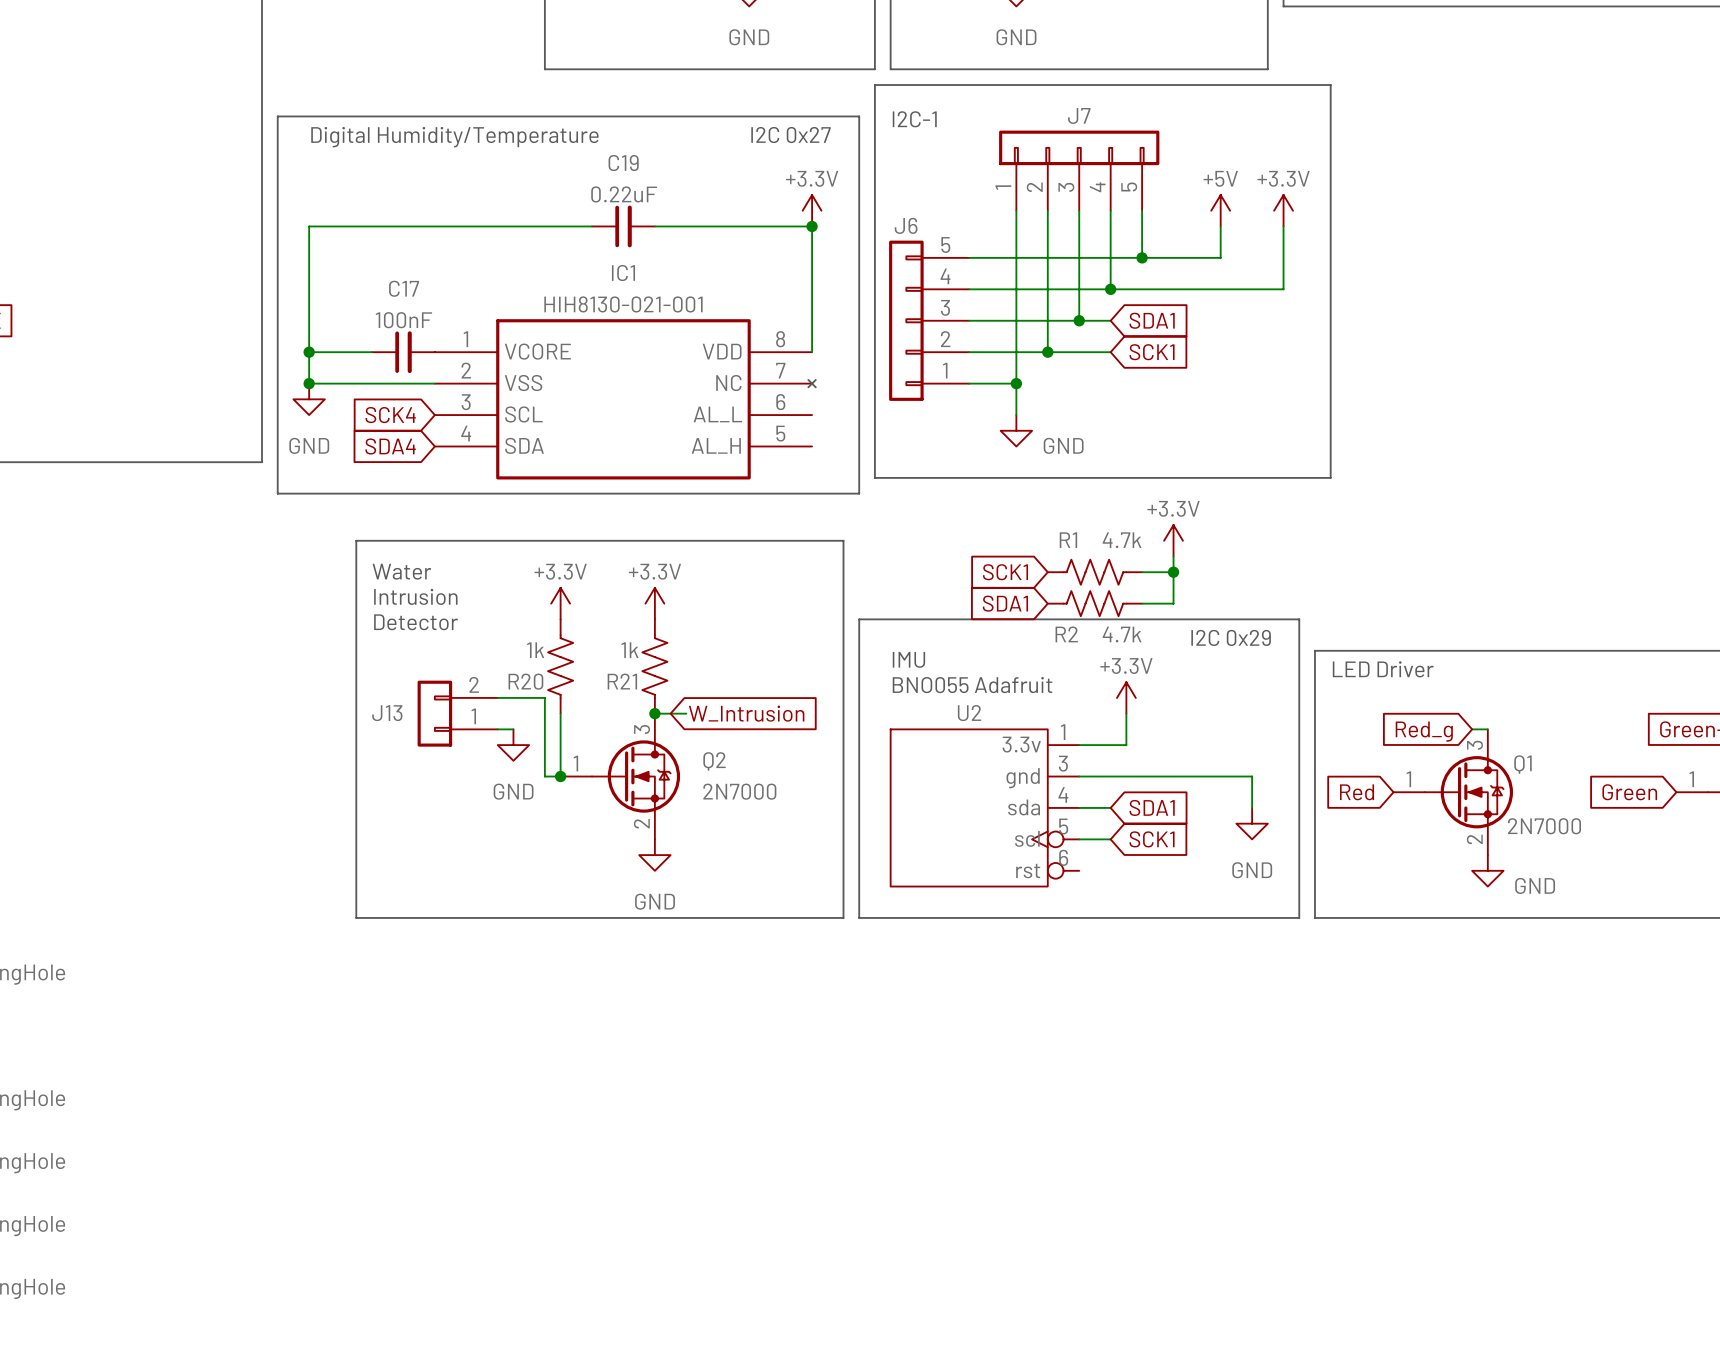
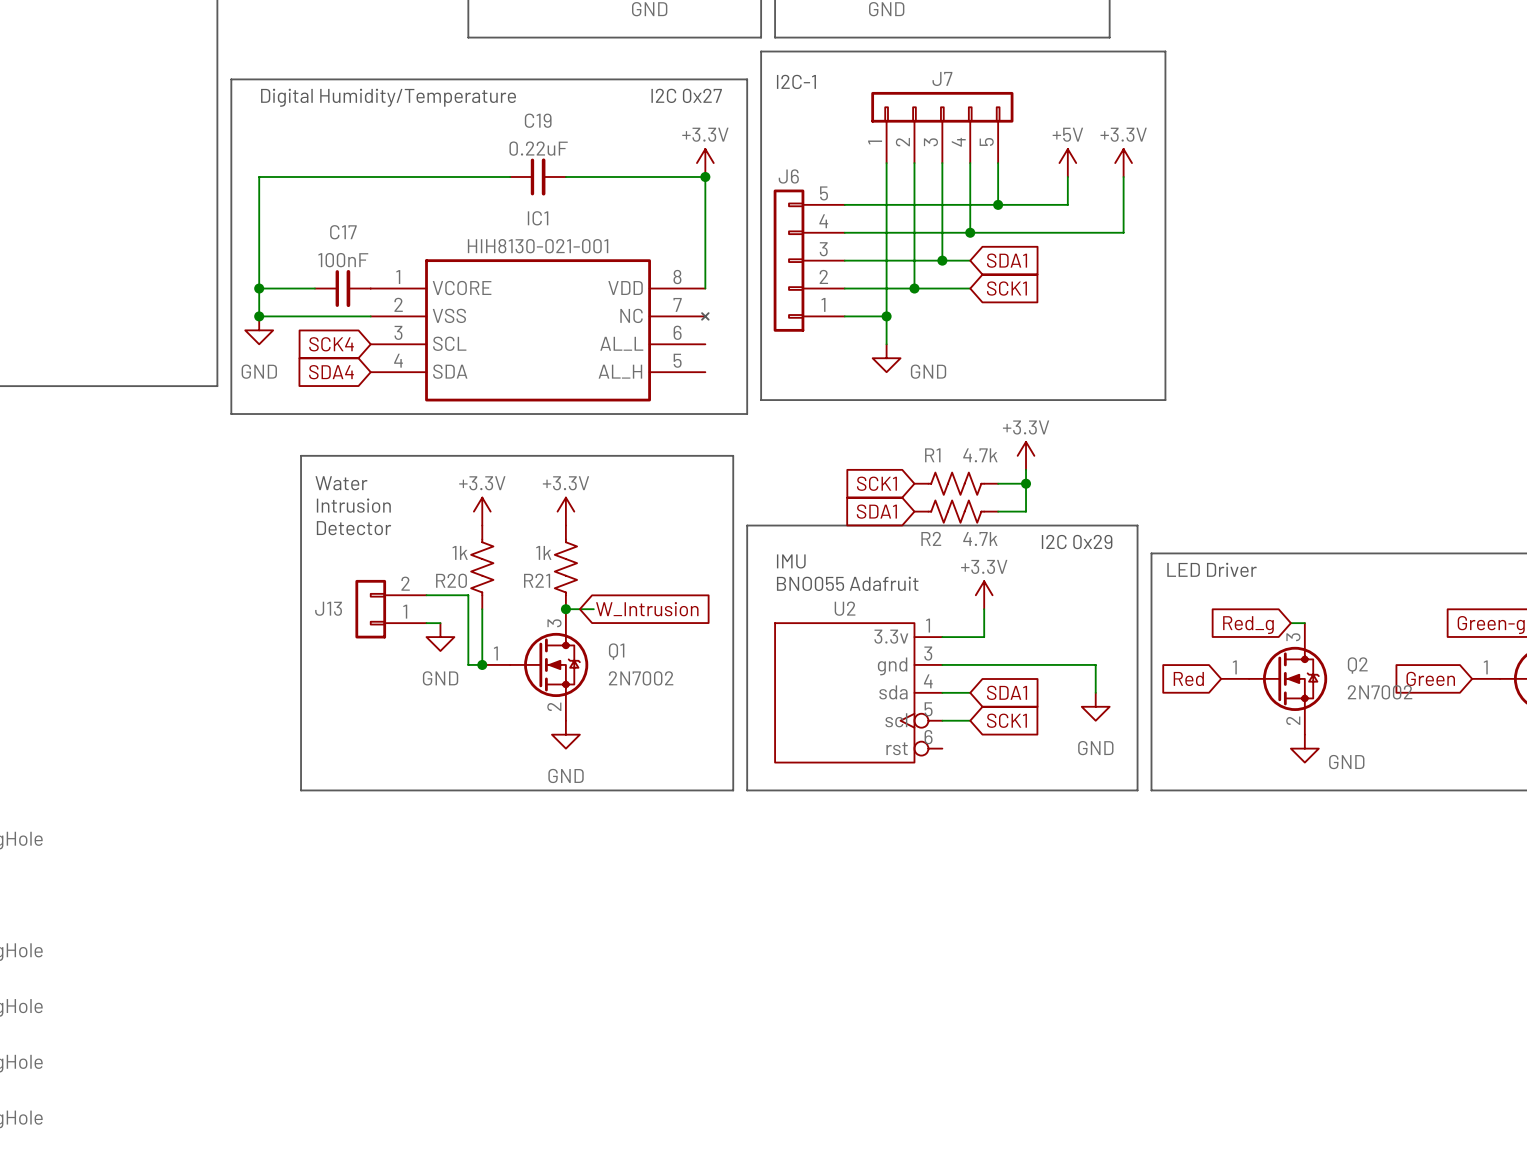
Q2 name: Q2 (714, 761) -> Q1 (616, 651)
Q1 name: Q1 (1523, 764) -> Q2 (1357, 665)
Q2 value: 2N7000 (739, 791) -> 2N7002 (641, 678)
Q1 value: 2N7000 (1544, 826) -> 2N7002 (1380, 692)

